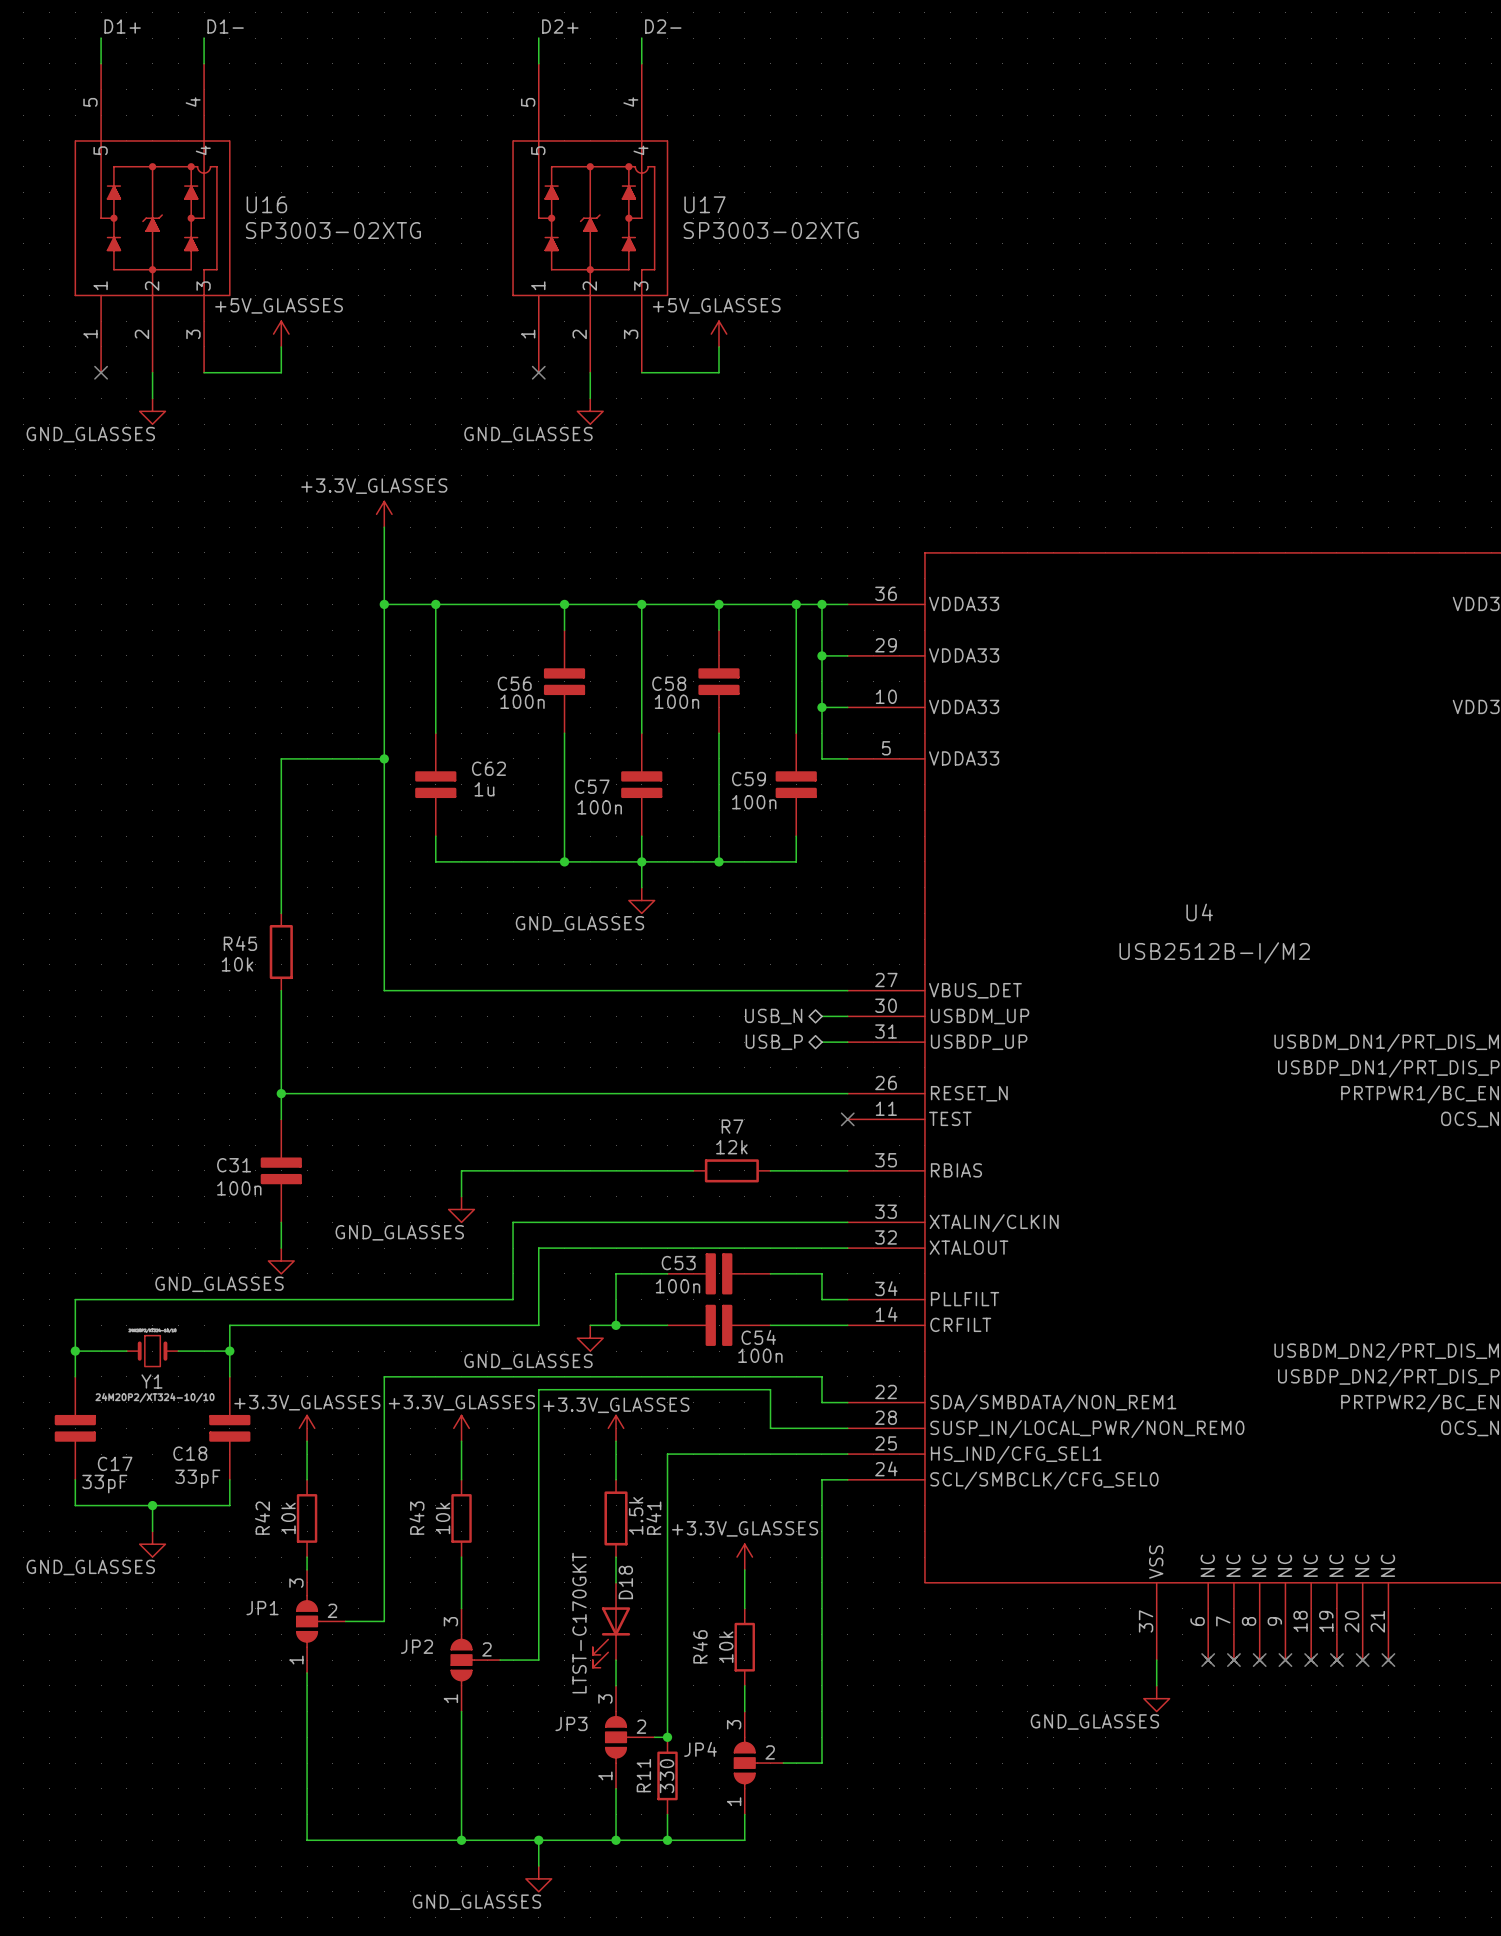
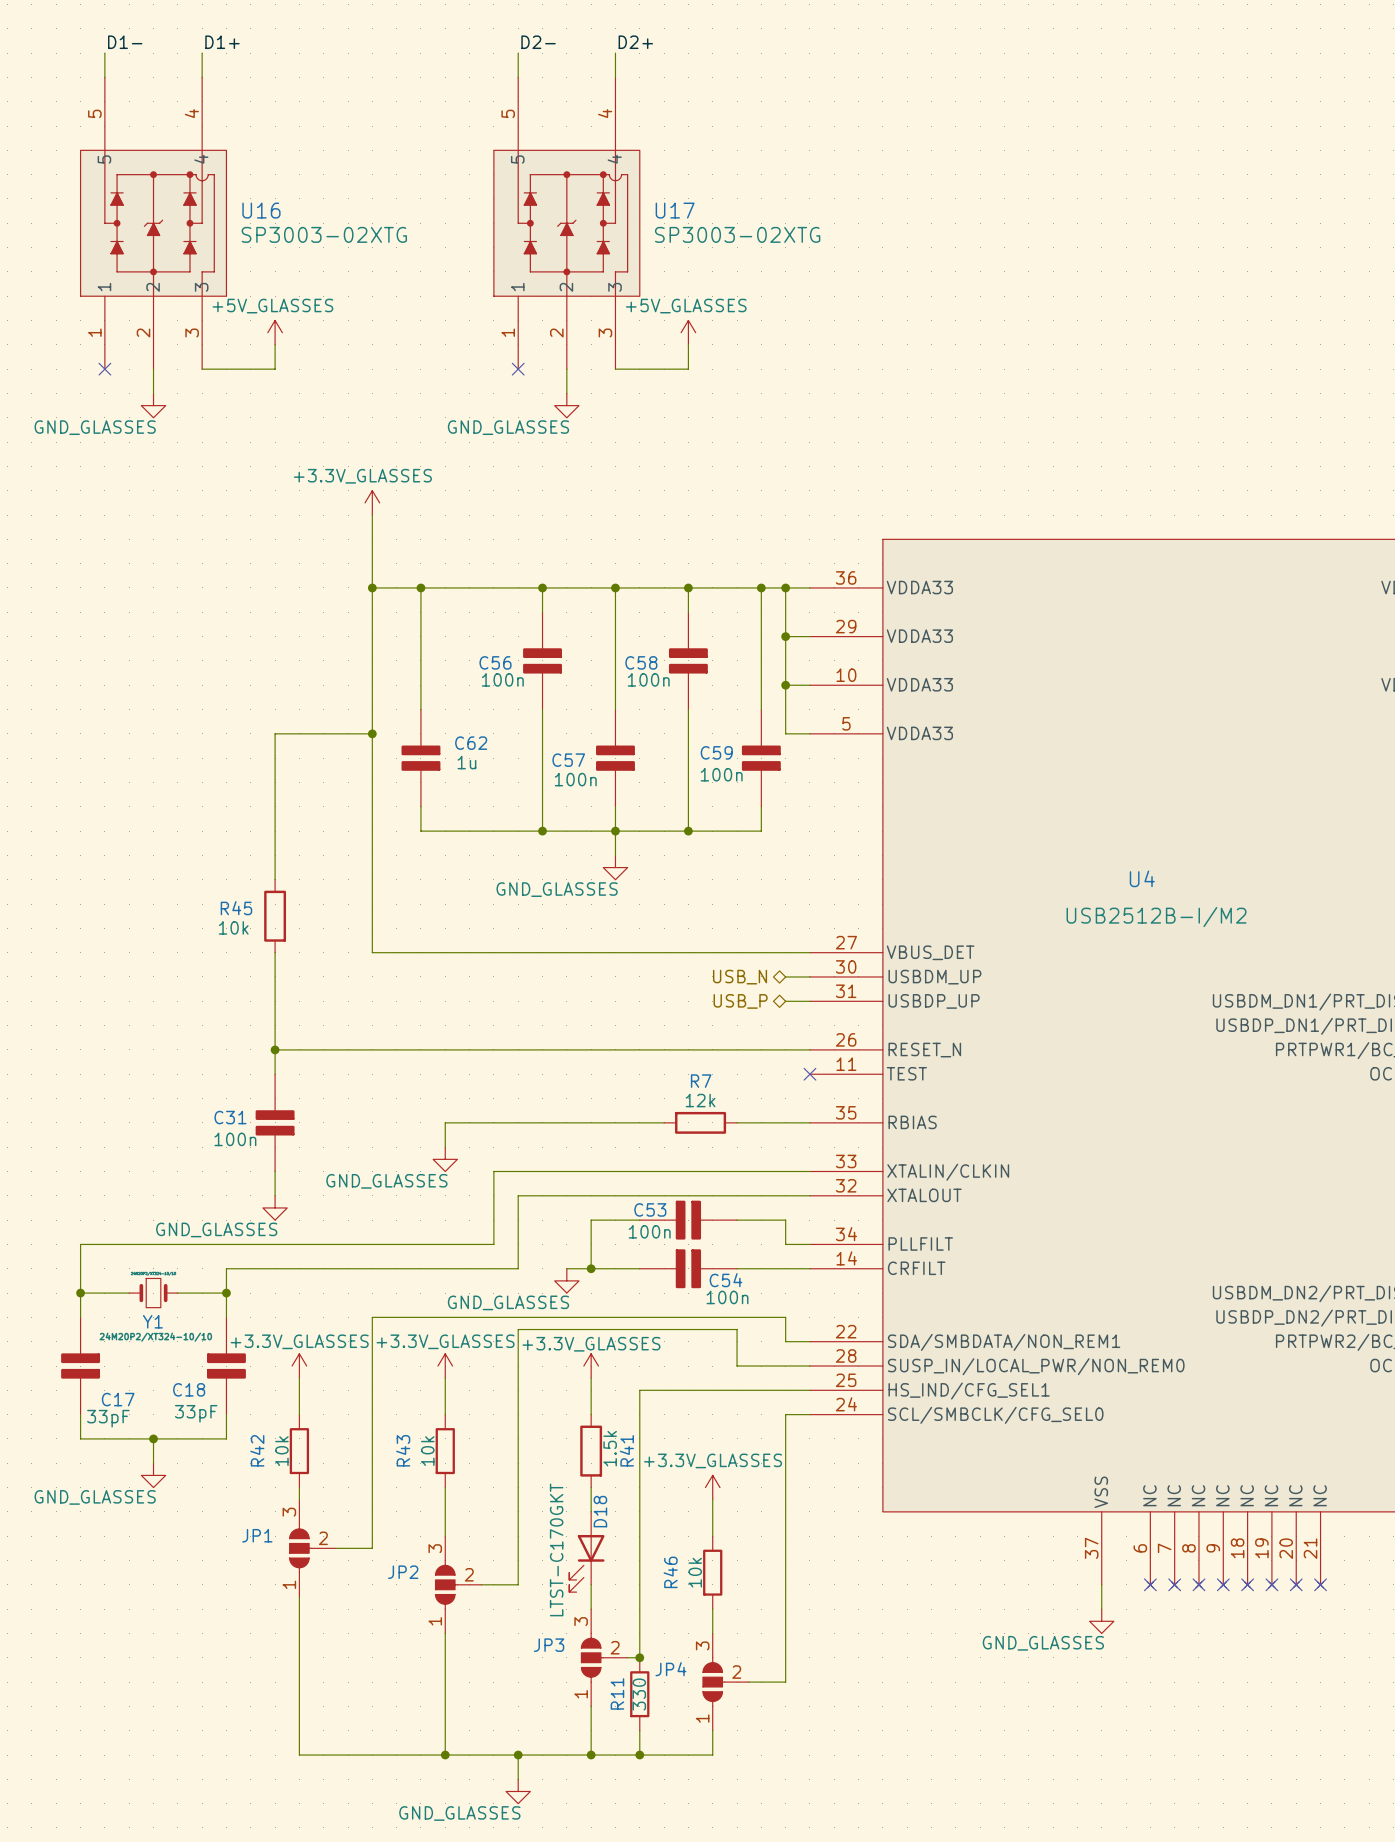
label: D1+ (122, 26) -> D1- (125, 42)
label: D1- (225, 26) -> D1+ (222, 42)
label: D2+ (560, 26) -> D2- (538, 42)
label: D2- (663, 26) -> D2+ (635, 42)

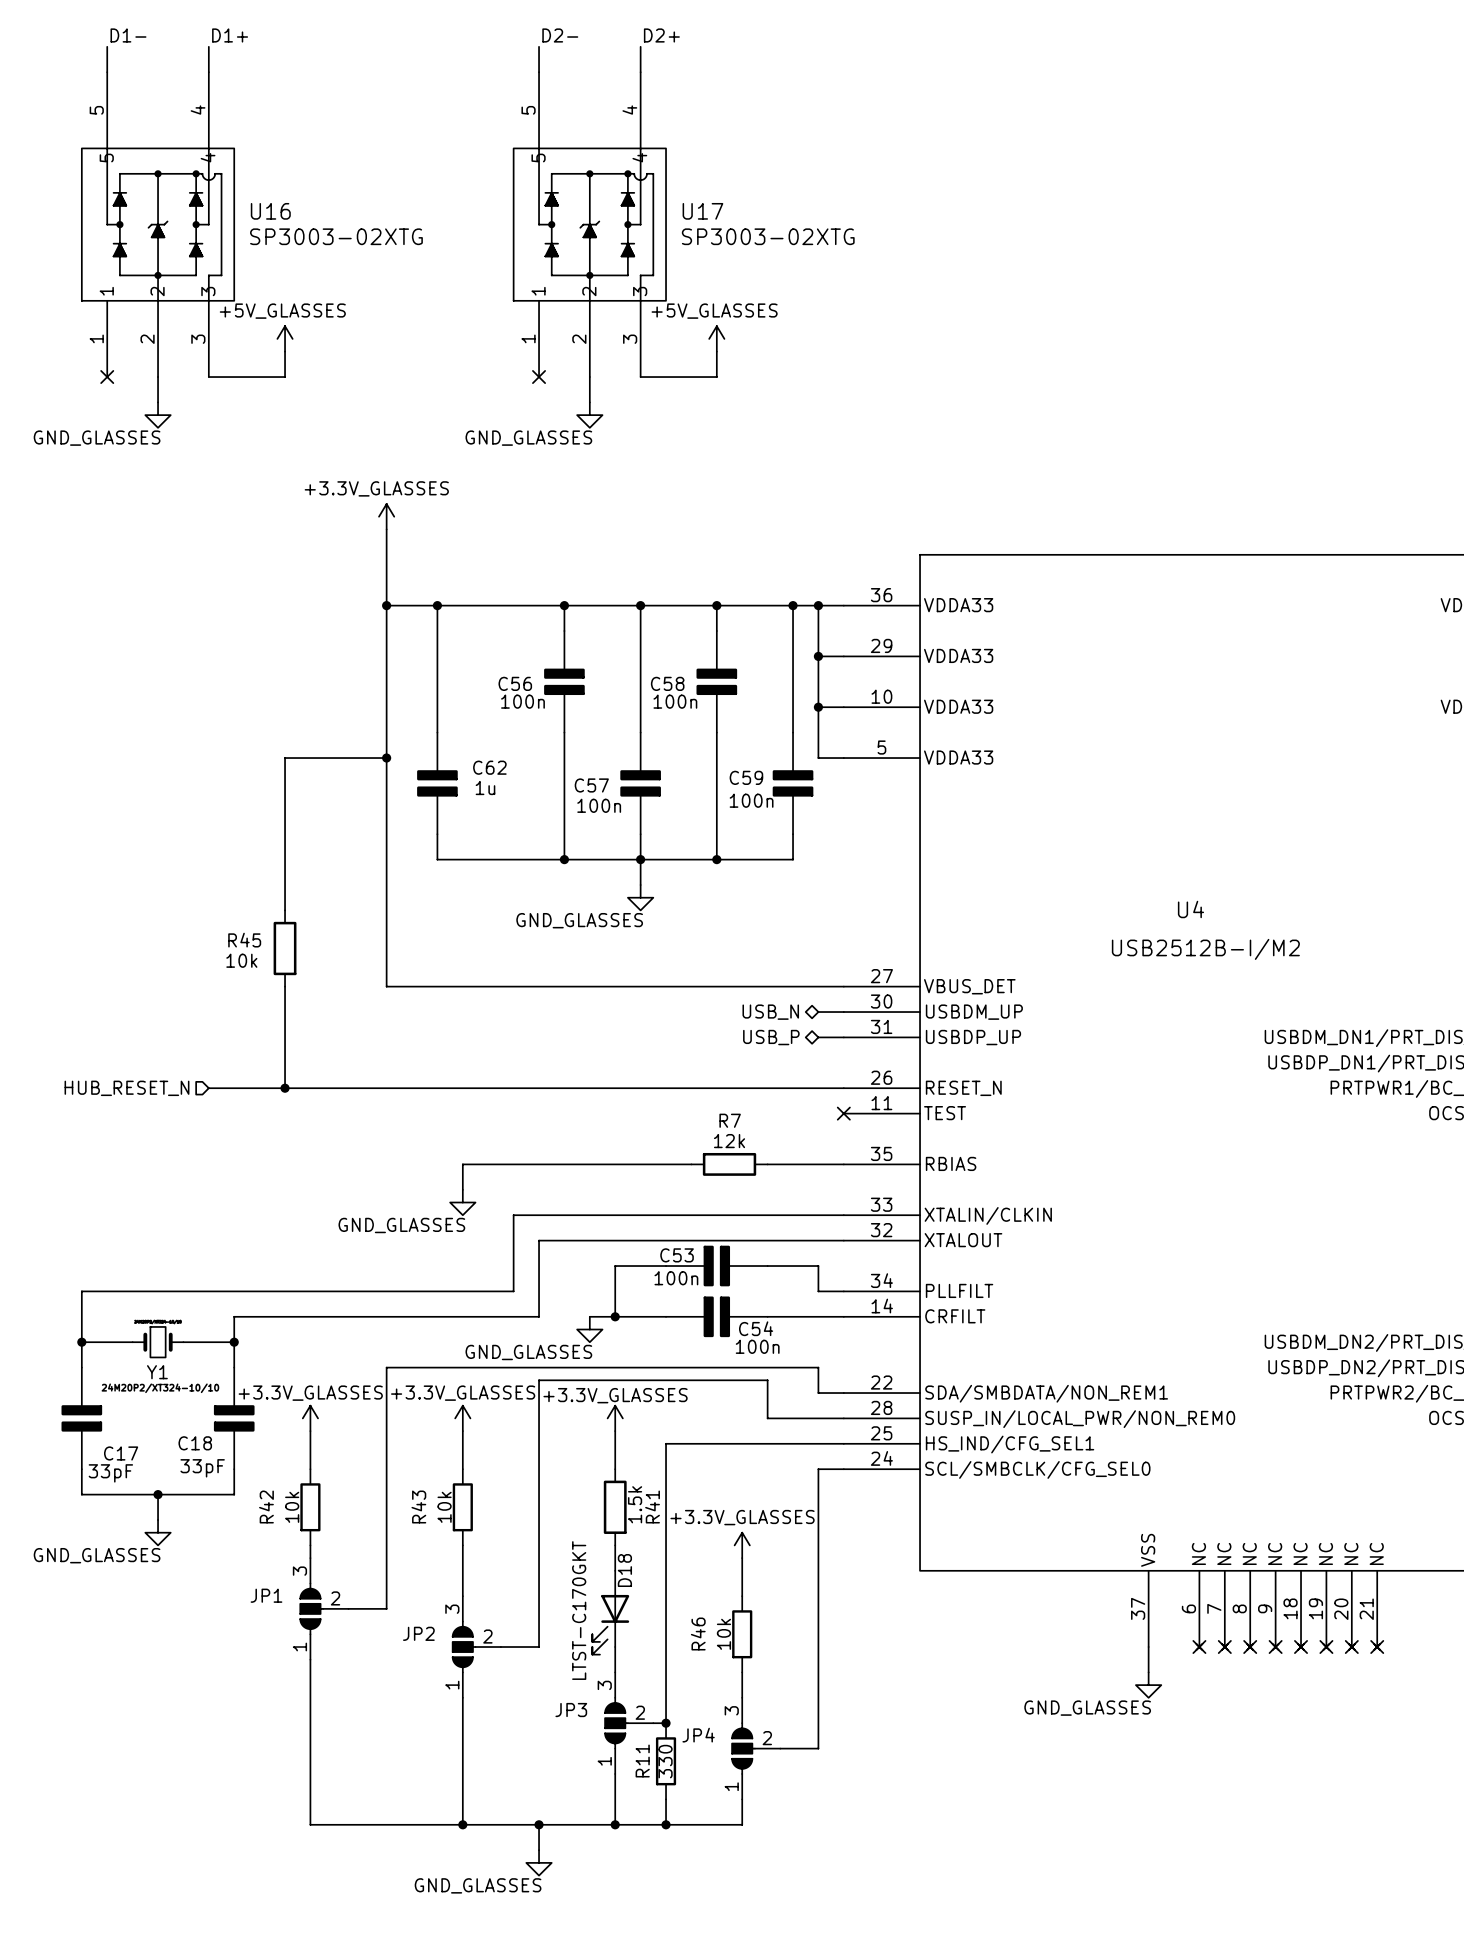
wire: (275, 1049) (275, 1074) -> (285, 1088) (208, 1088)
hierarchical label: none -> HUB_RESET_N (126, 1088)
C31: 100n (275, 1122) -> none
wire: (275, 1171) (275, 1195) -> none
power symbol: GND_GLASSES (275, 1207) -> none

